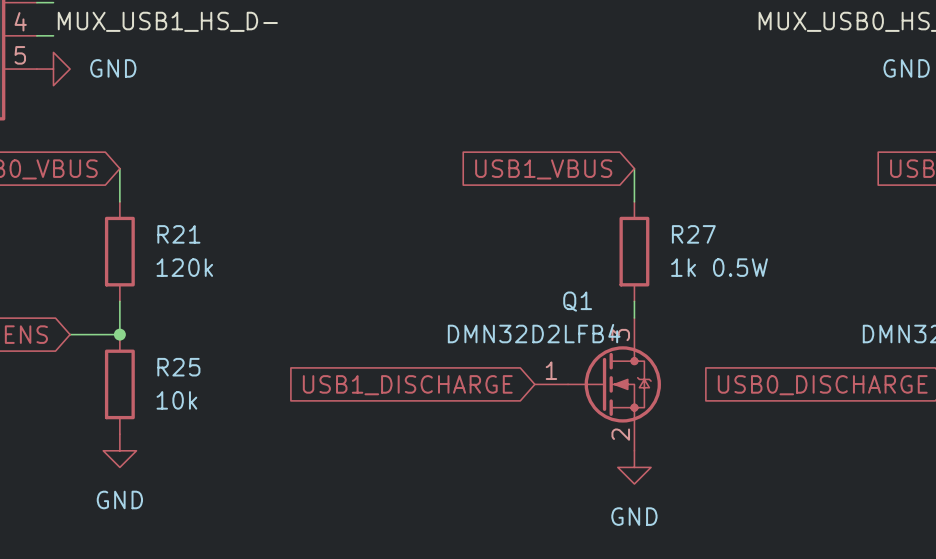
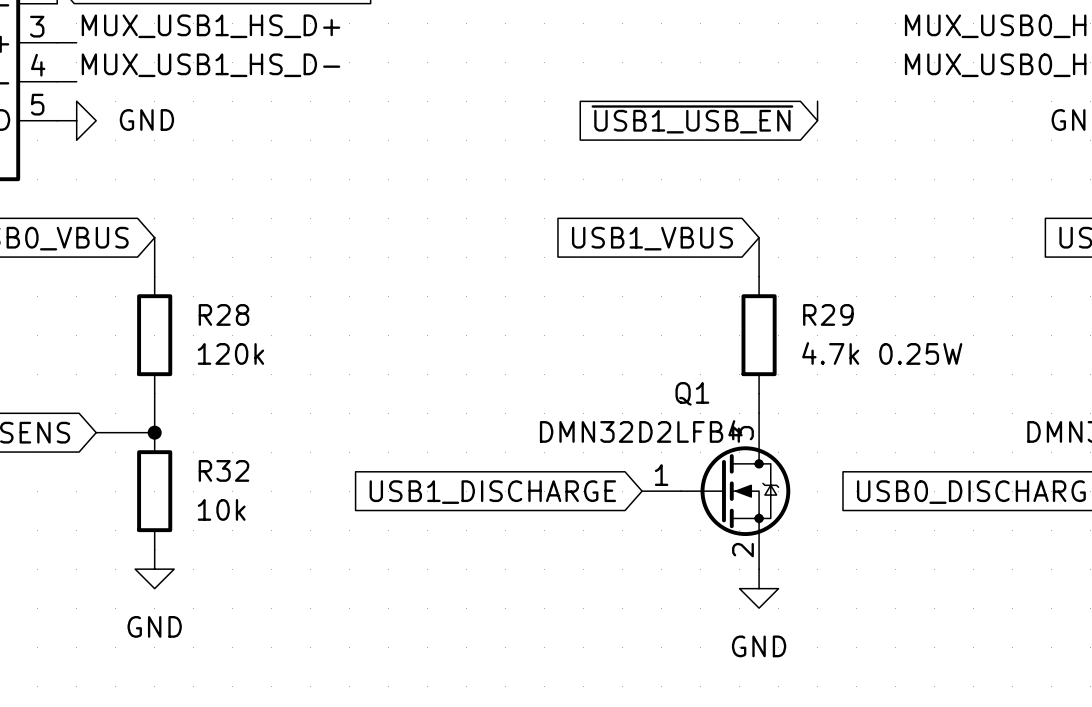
wire: none -> (817, 101) (817, 120)
global label: none -> ~{USB1_USB_EN} (692, 119)
R21 name: R21 (178, 234) -> R28 (223, 314)
R27 name: R27 (693, 234) -> R29 (828, 314)
R27 value: 1k 0.5W (719, 267) -> 4.7k 0.25W (882, 353)
R25 name: R25 (178, 367) -> R32 (223, 470)

